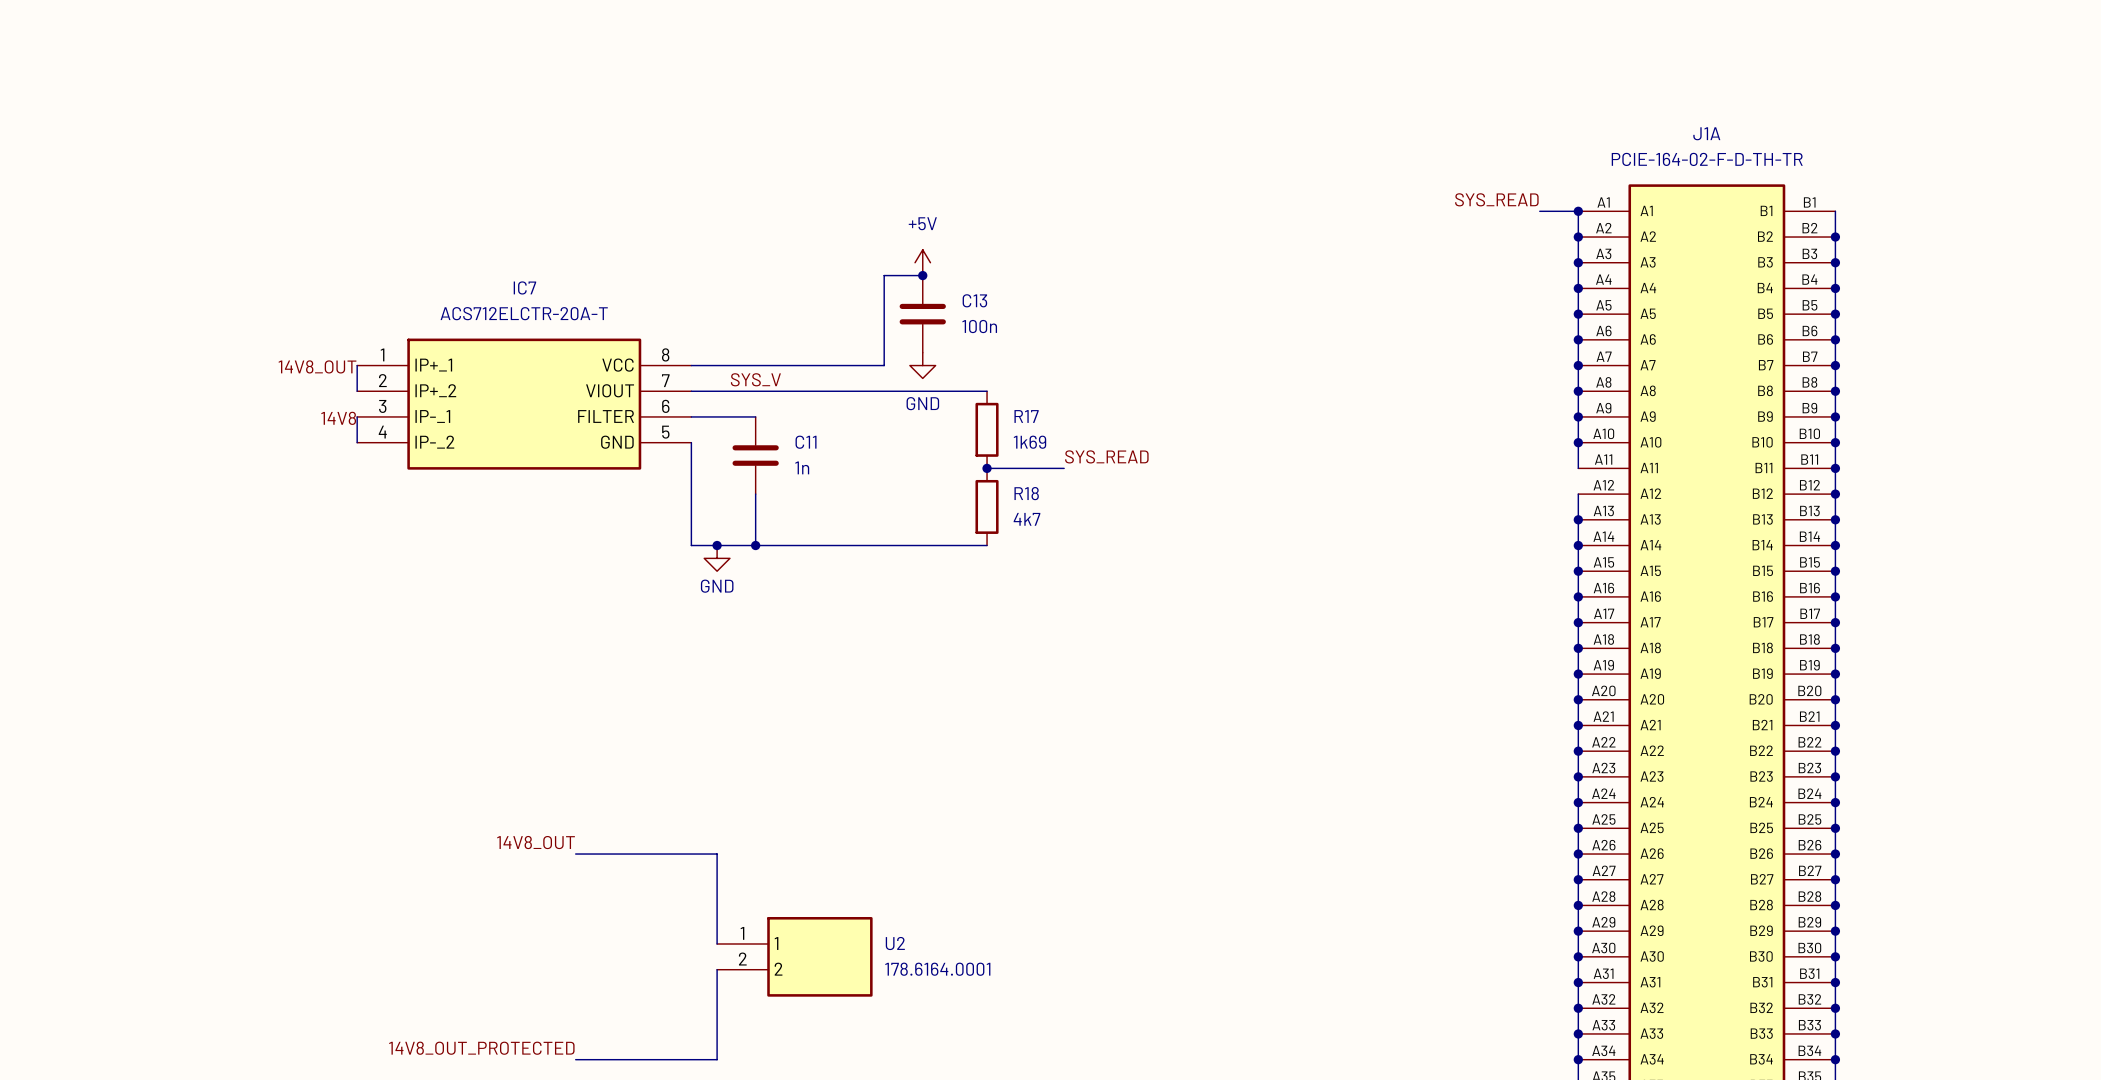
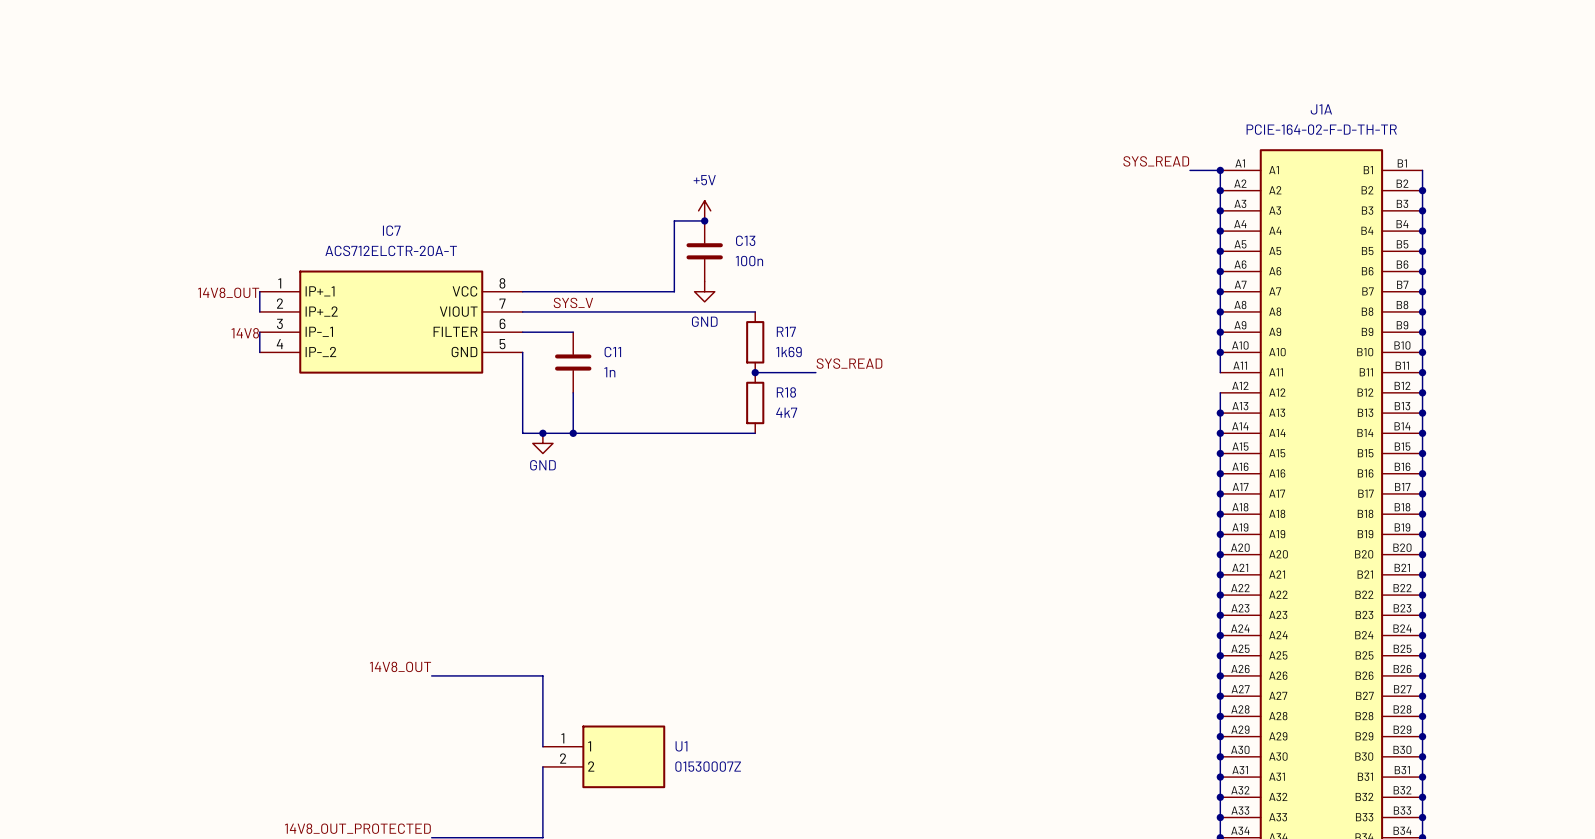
U2 name: U2 (895, 943) -> U1 (681, 746)
U2 value: 178.6164.0001 (937, 969) -> 01530007Z (708, 766)

